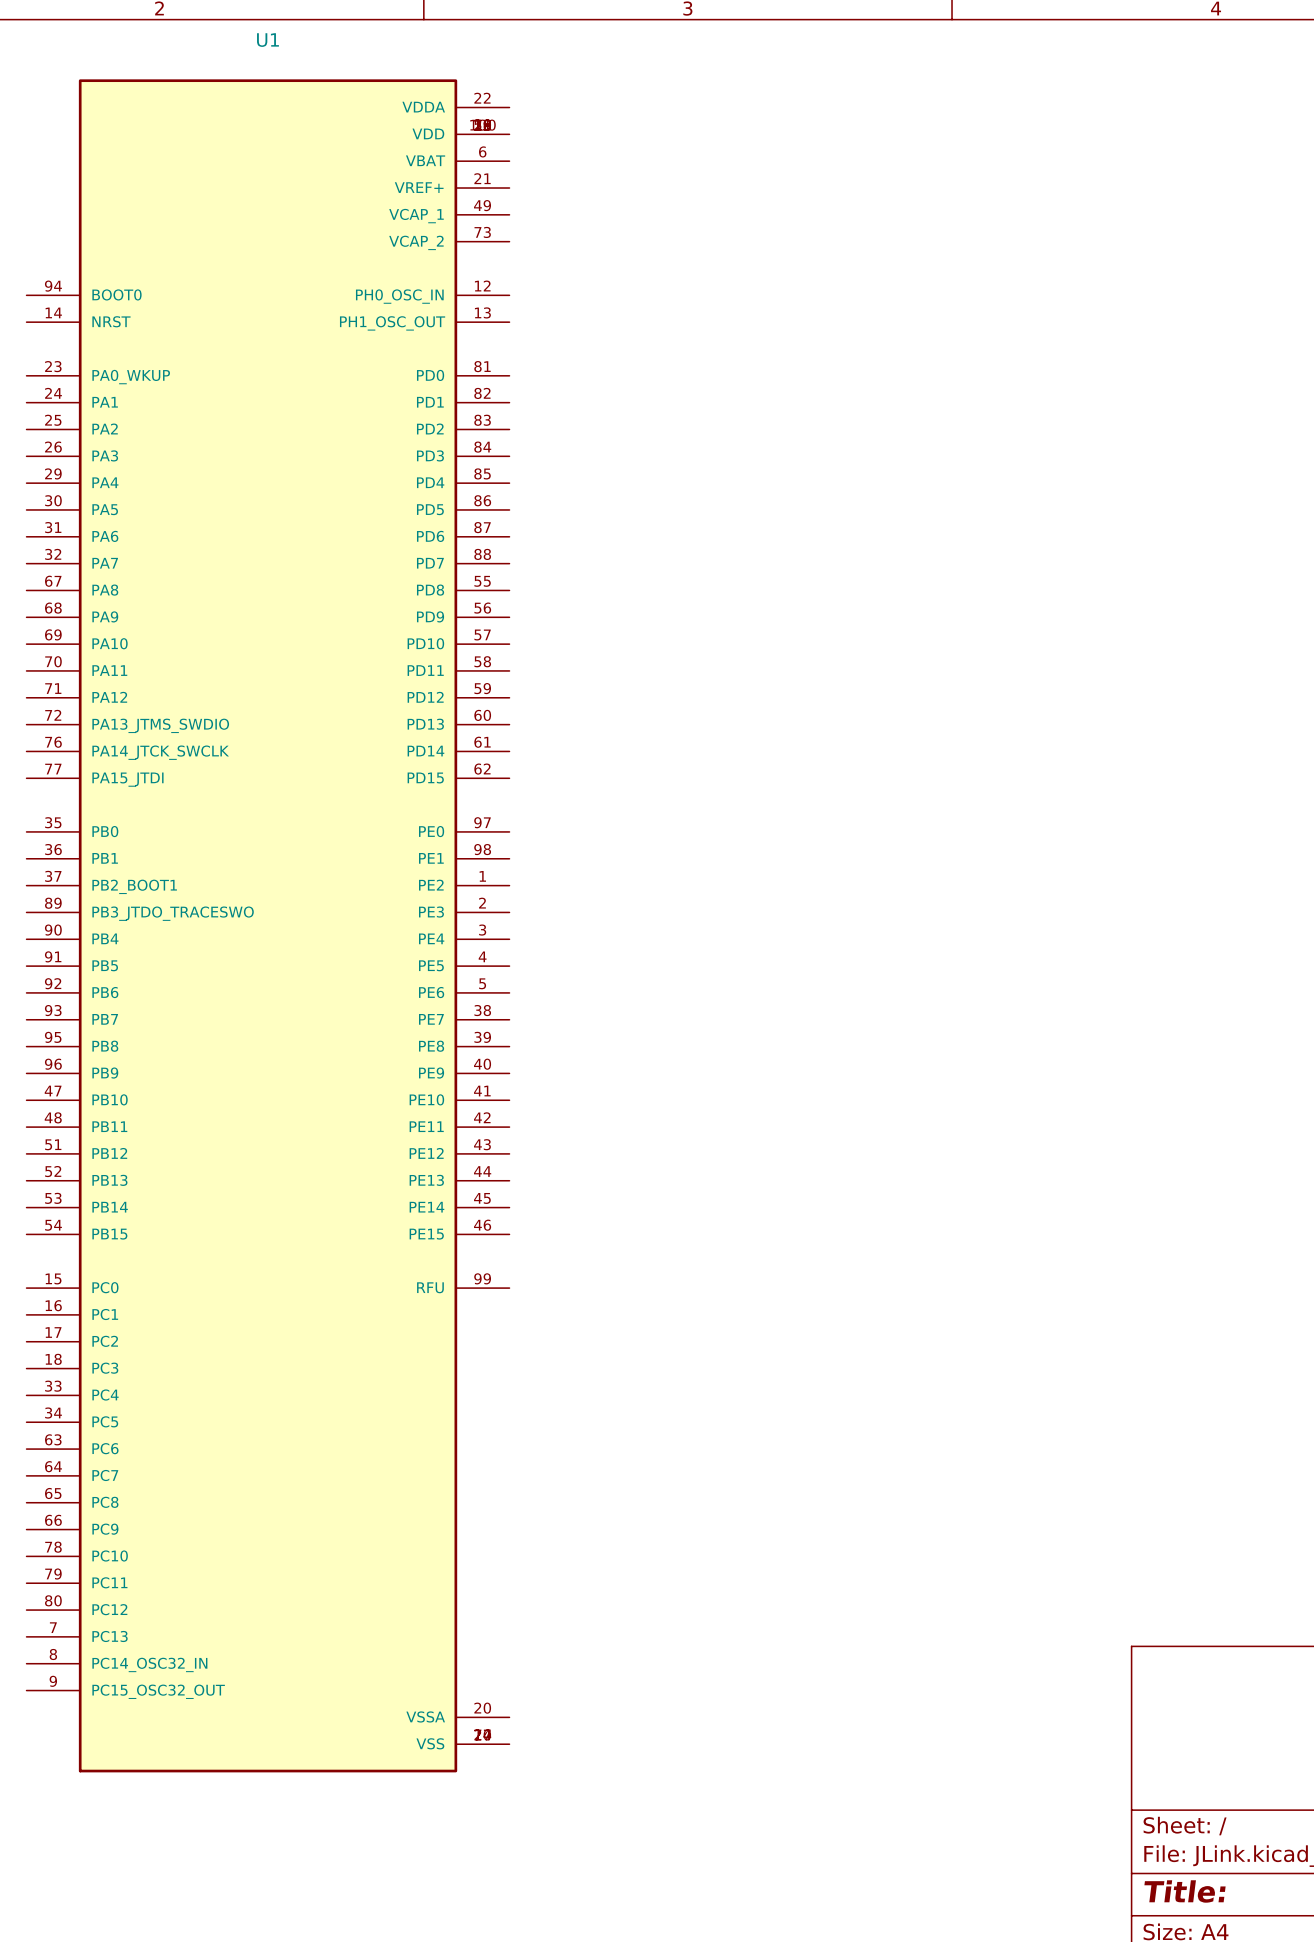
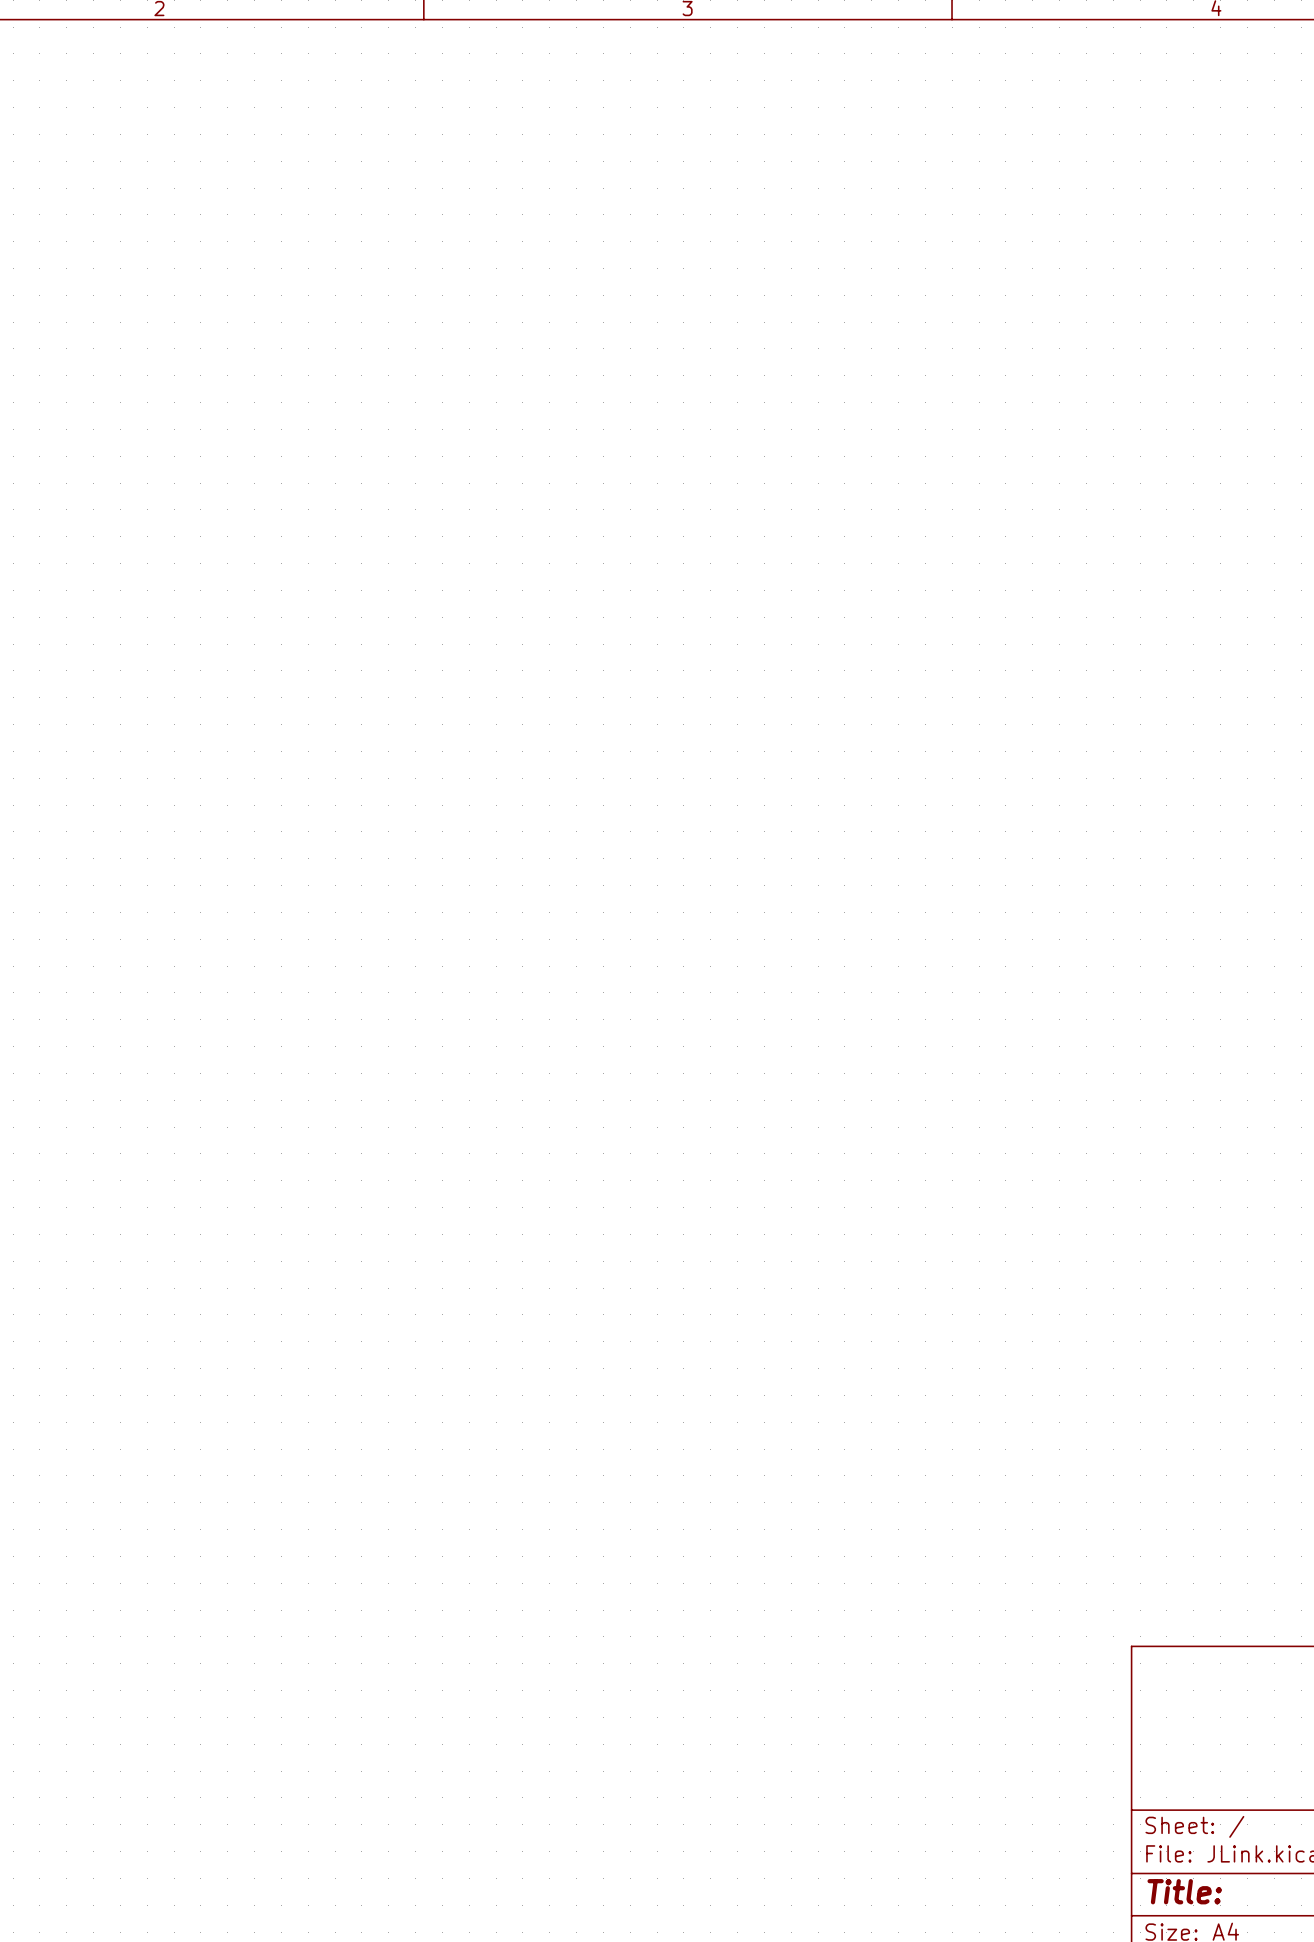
U1: (268, 925) -> none

